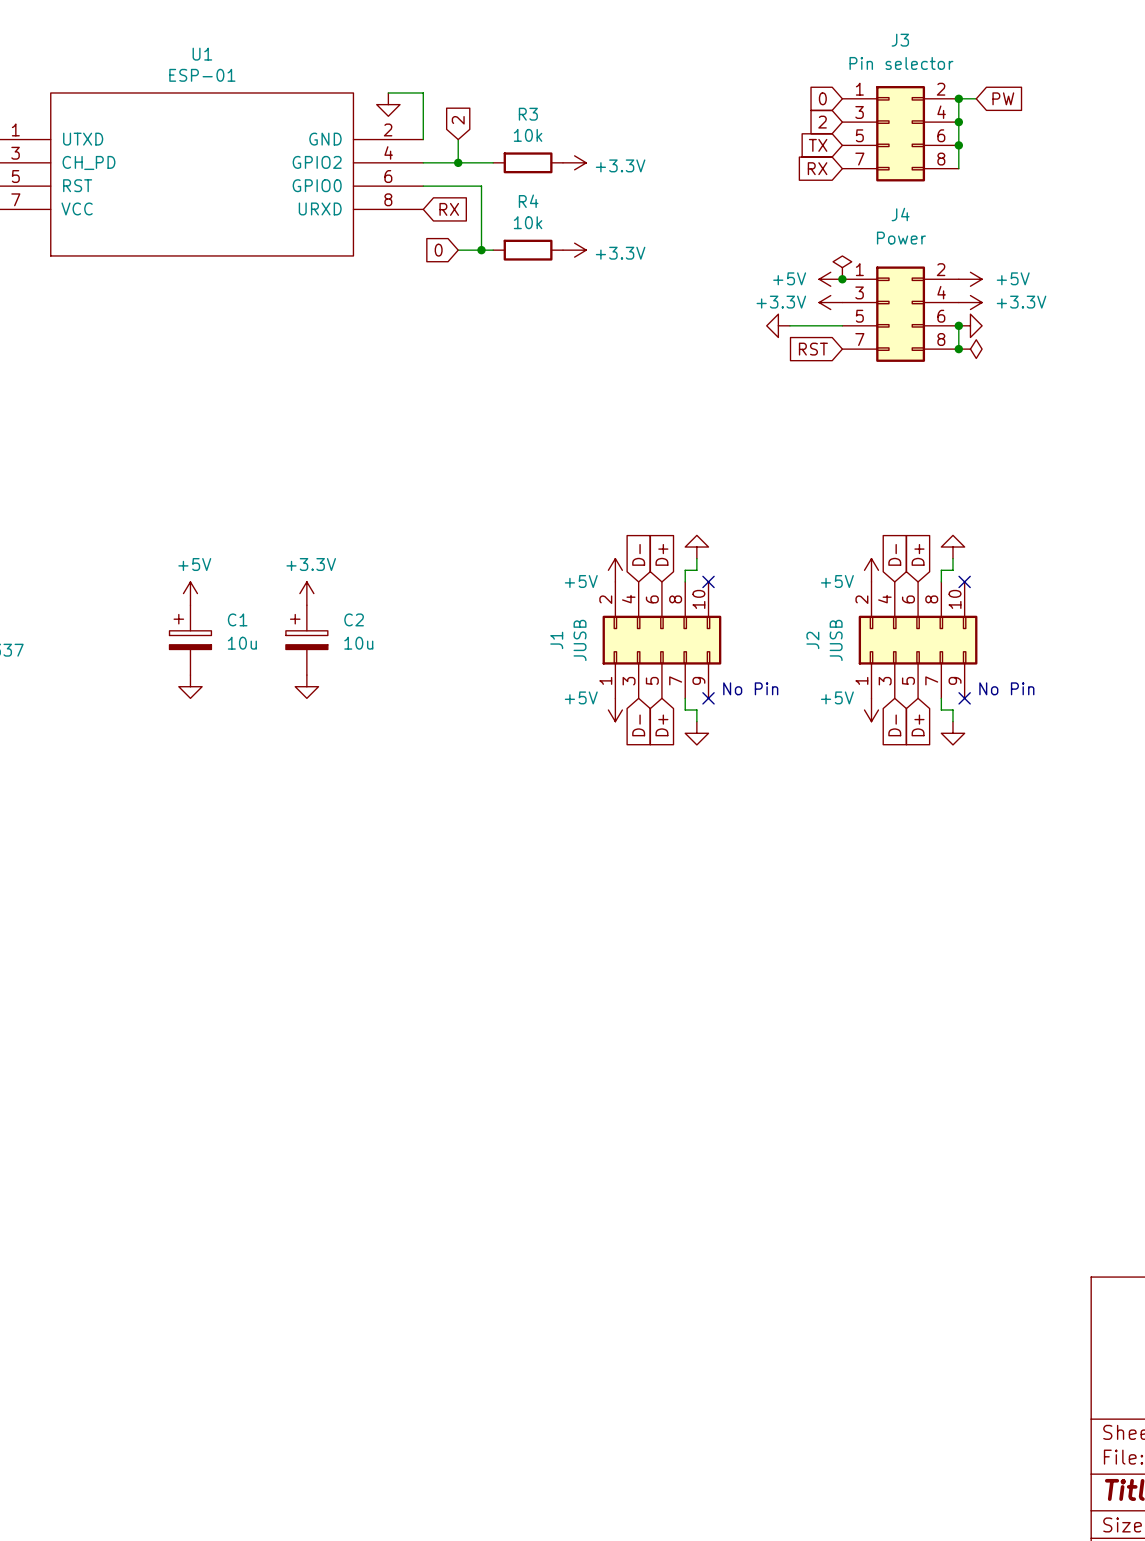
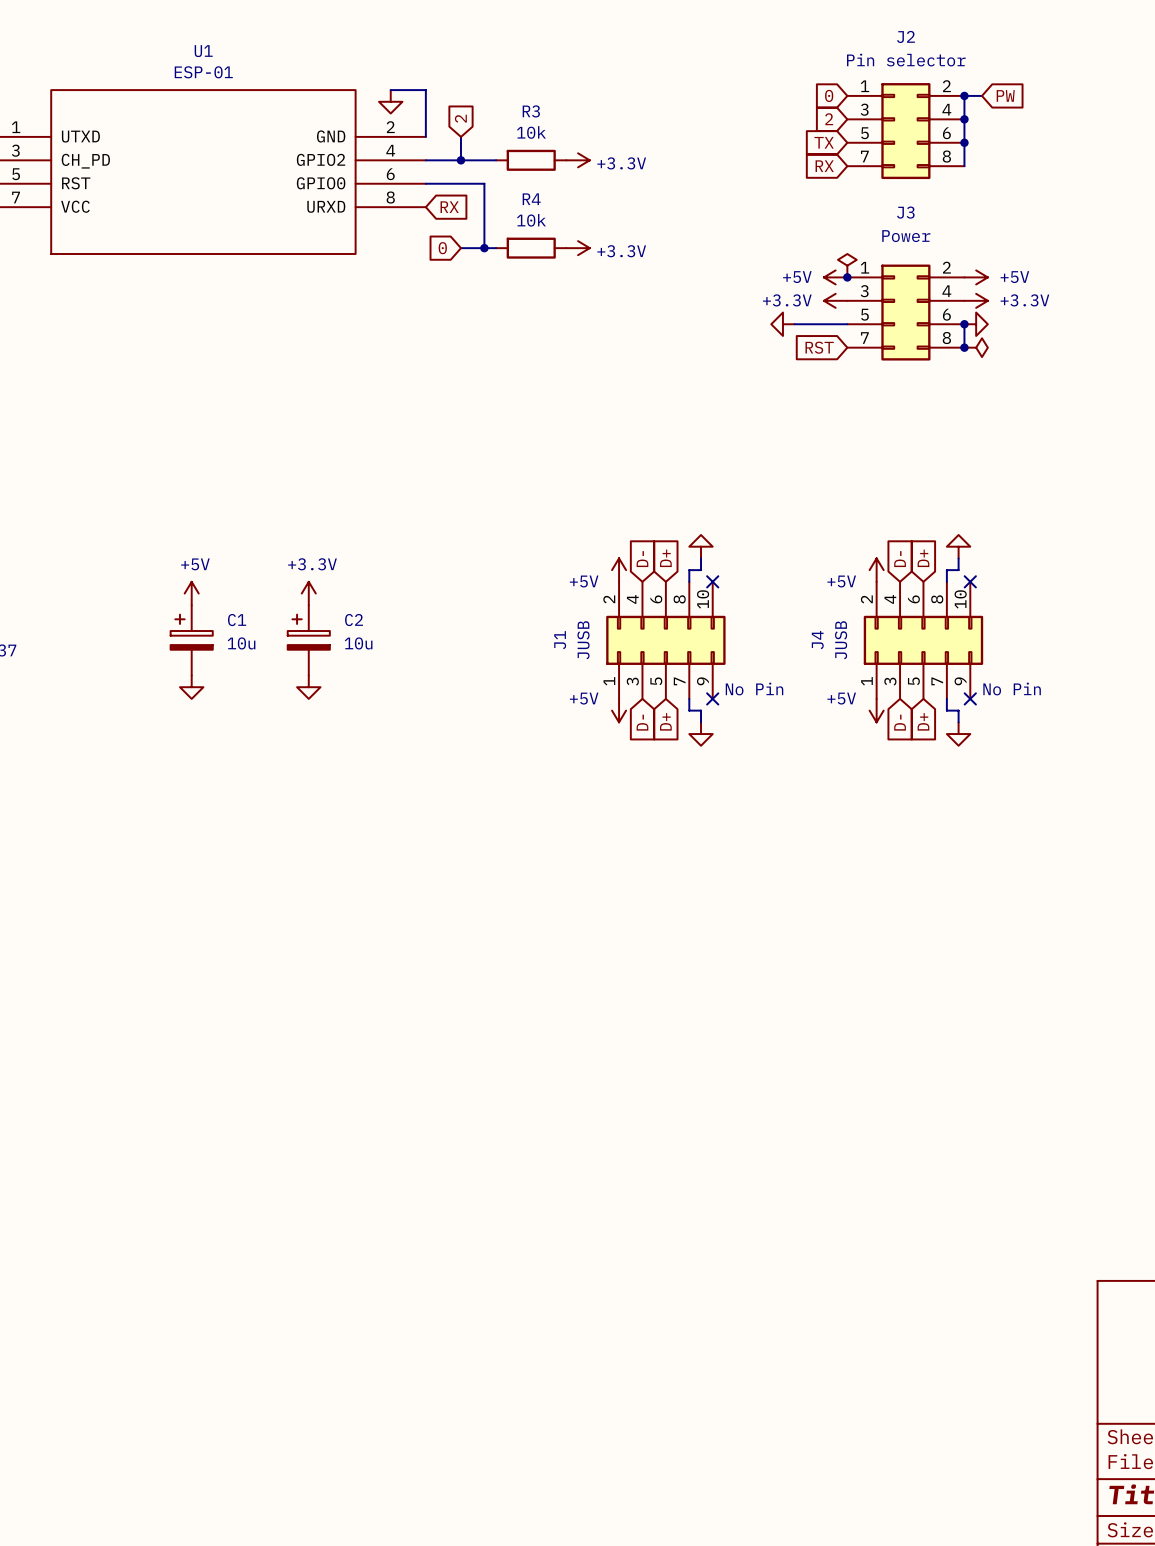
J3 name: J3 (900, 40) -> J2 (905, 36)
J4 name: J4 (900, 214) -> J3 (905, 212)
J2 name: J2 (812, 640) -> J4 (817, 640)

